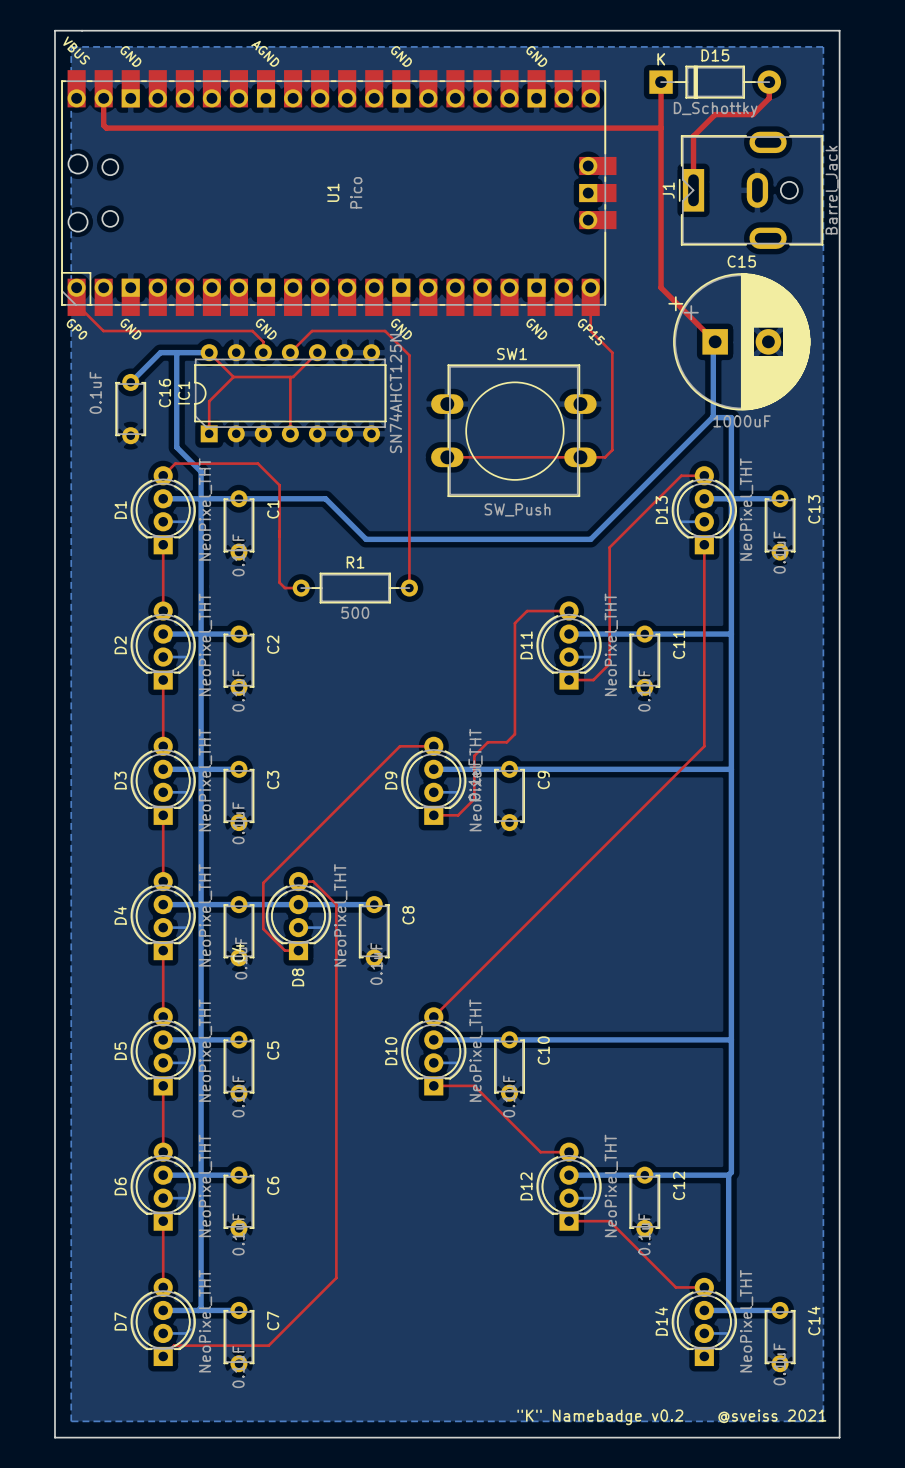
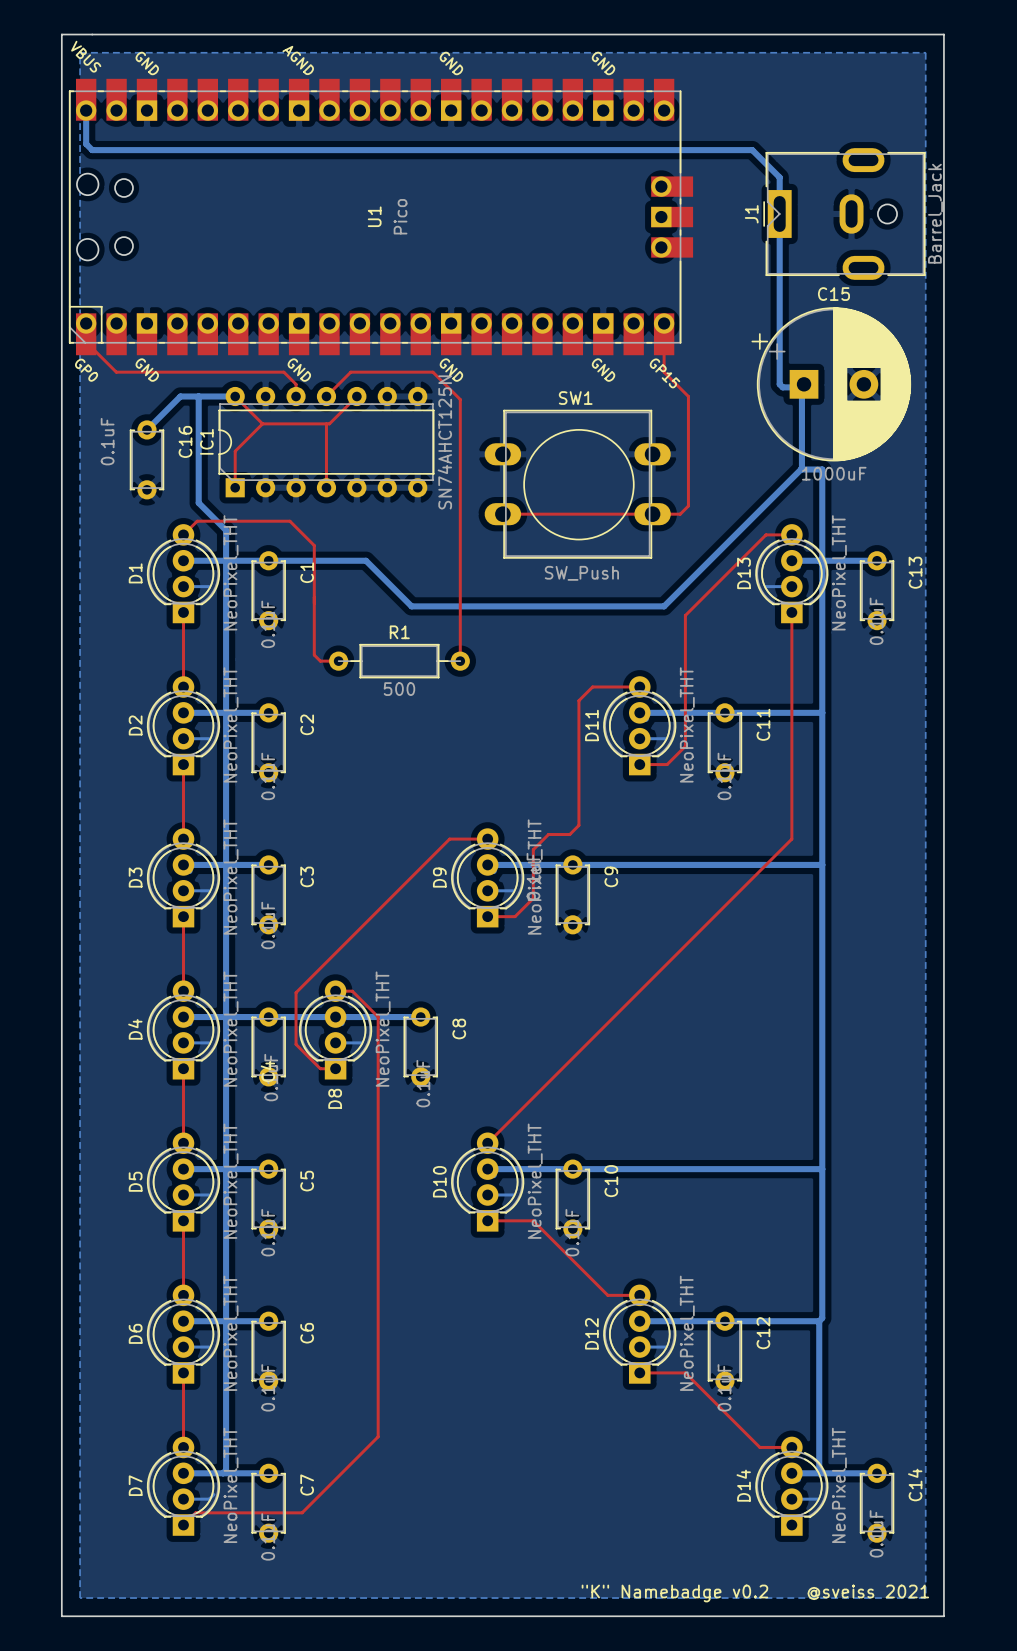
top track: (661, 82) (661, 287) (715, 341) -> none
D15: D_Schottky (715, 82) -> none
top track: (769, 82) (769, 98) (753, 114) (715, 114) (693, 136) (693, 190) (693, 182) -> none
bottom track: none -> (86, 110) (86, 144) (92, 150) (752, 150) (779, 177) (779, 384) (782, 387) (801, 387)
top track: (103, 98) (103, 125) (106, 128) (661, 128) -> none

